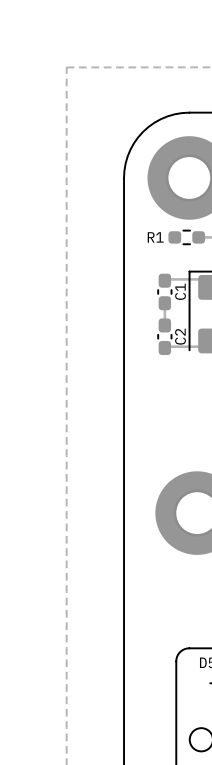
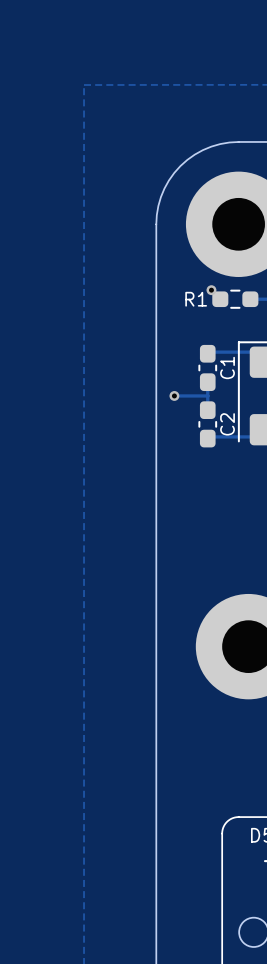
via: none -> (211, 290)
track: none -> (174, 395) (207, 395)
via: none -> (174, 395)

